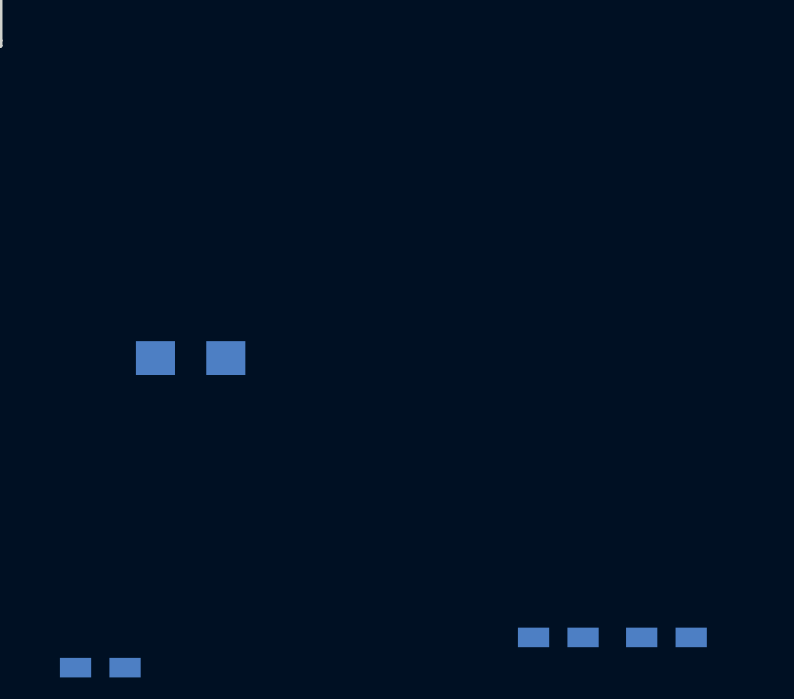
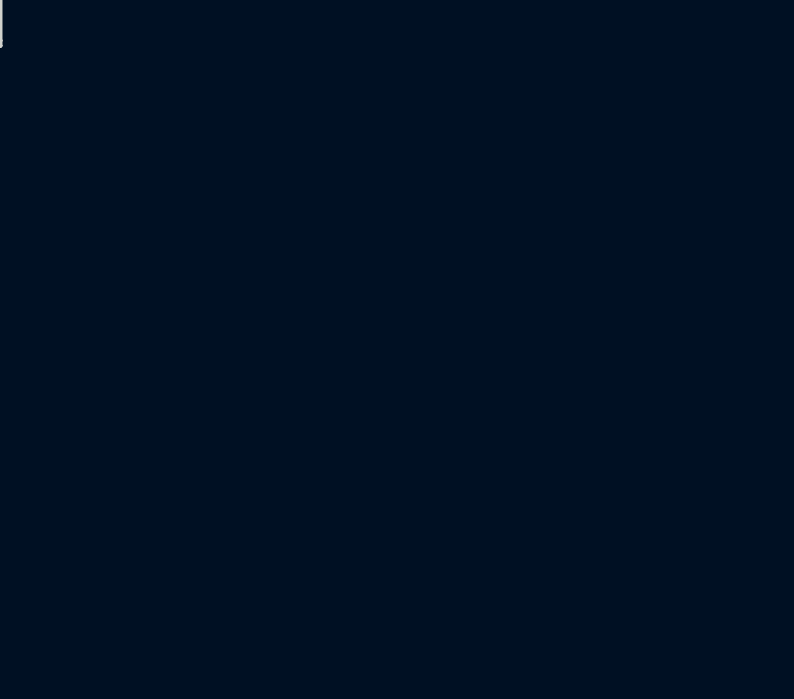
part: (190, 358) -> none
part: (558, 637) -> none
part: (666, 637) -> none
part: (100, 667) -> none

